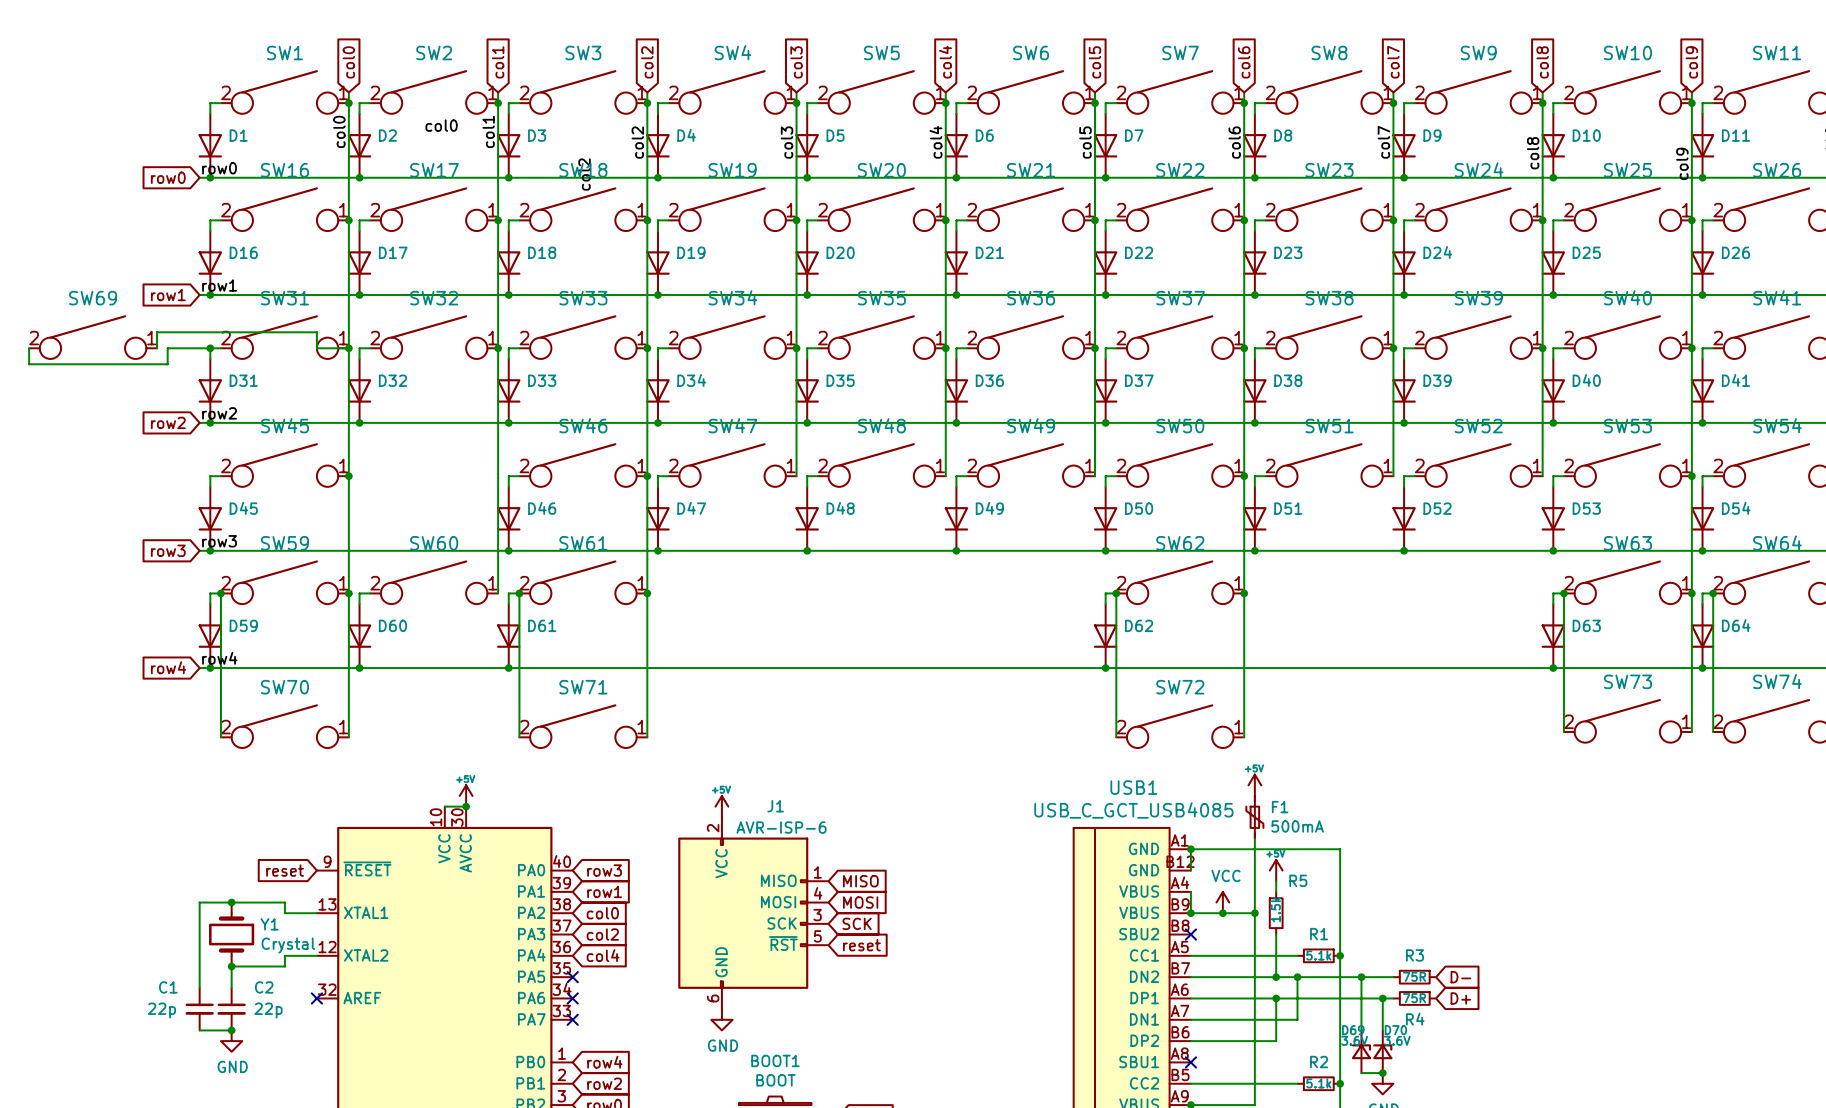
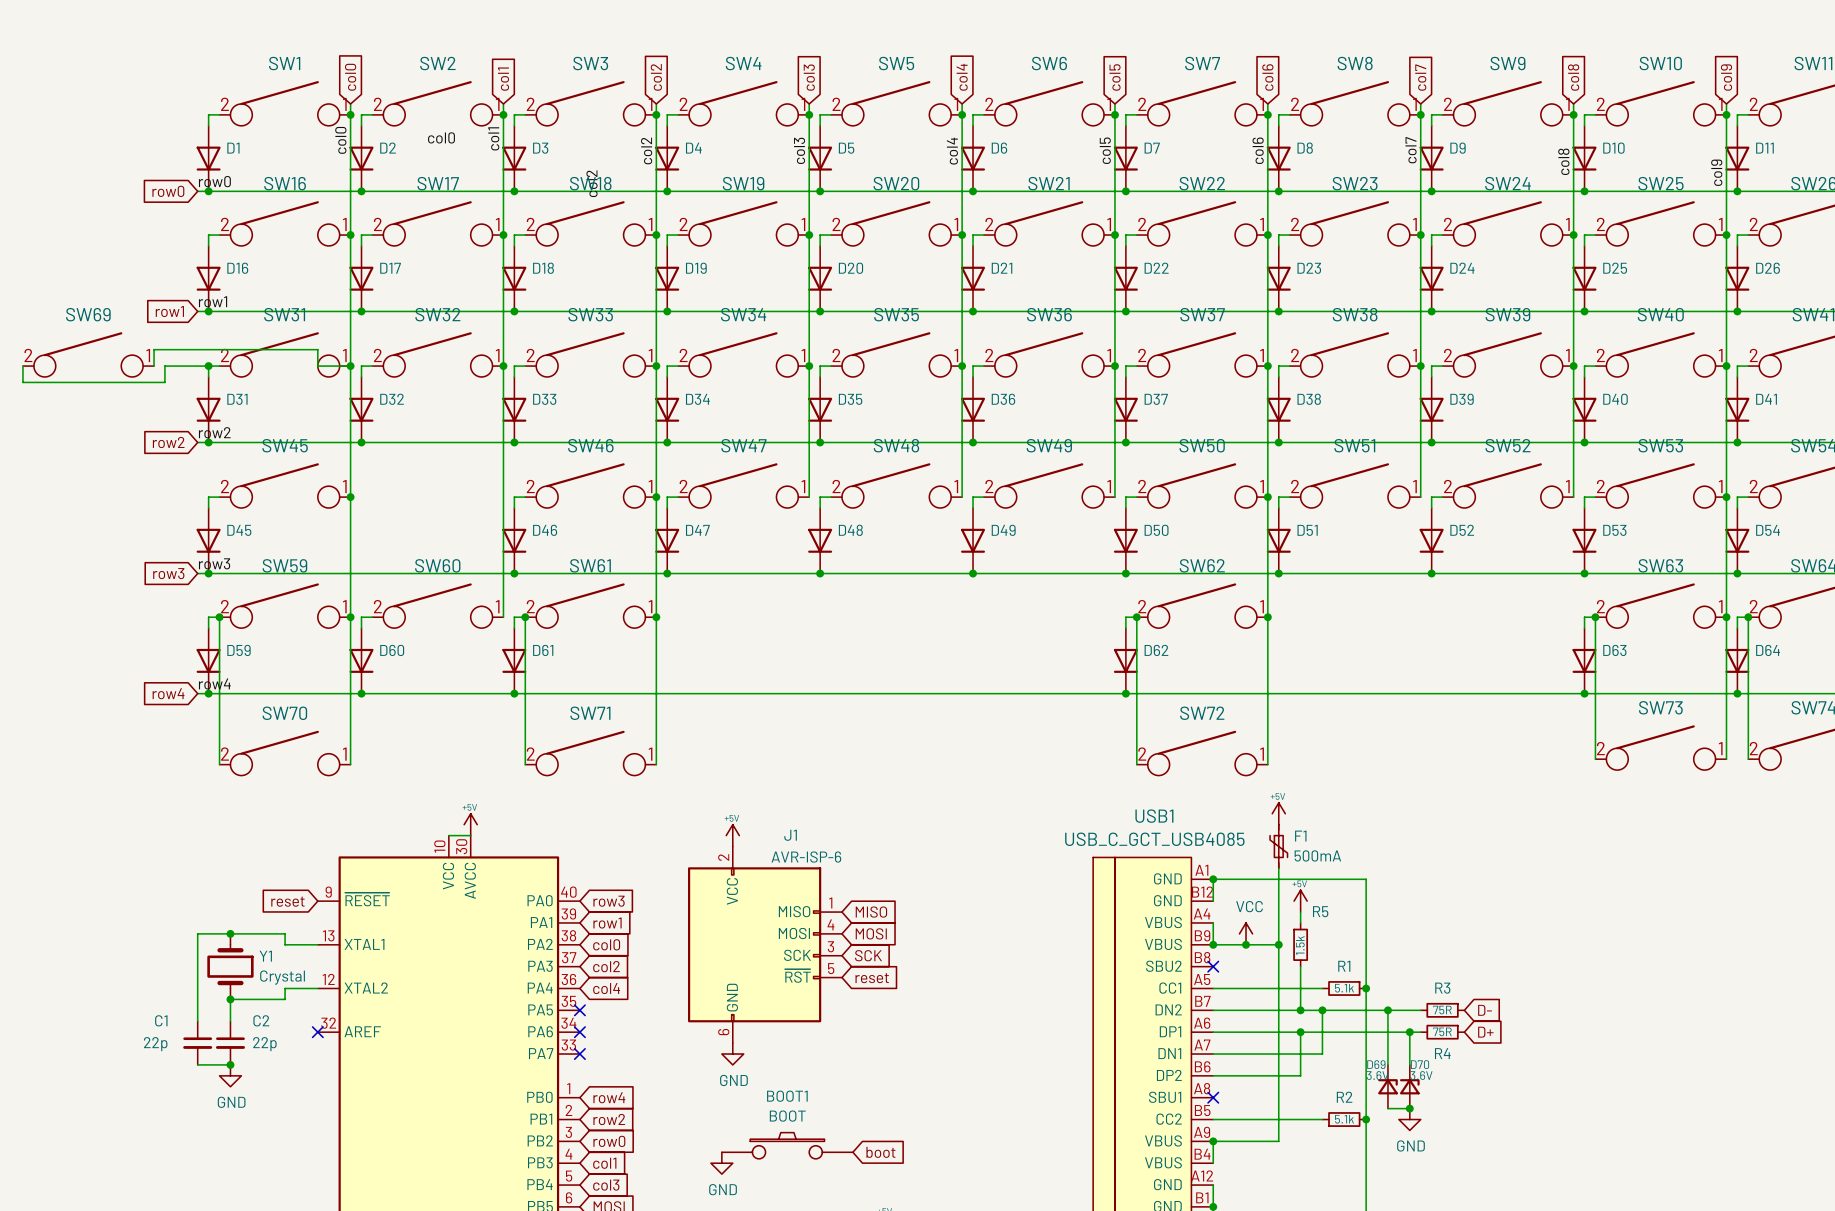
junction: (466, 806) -> none

